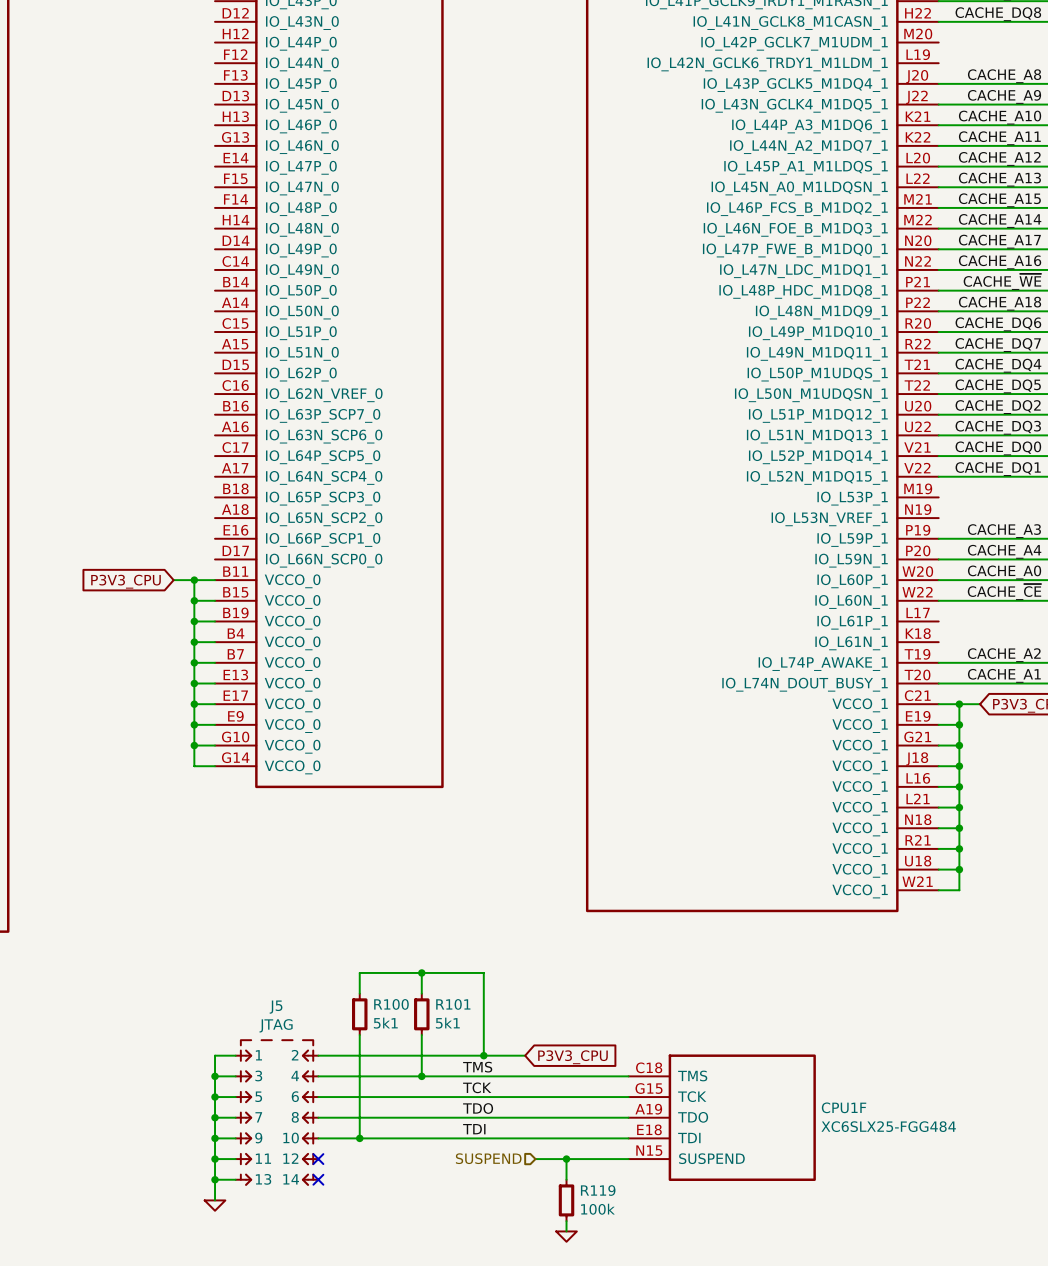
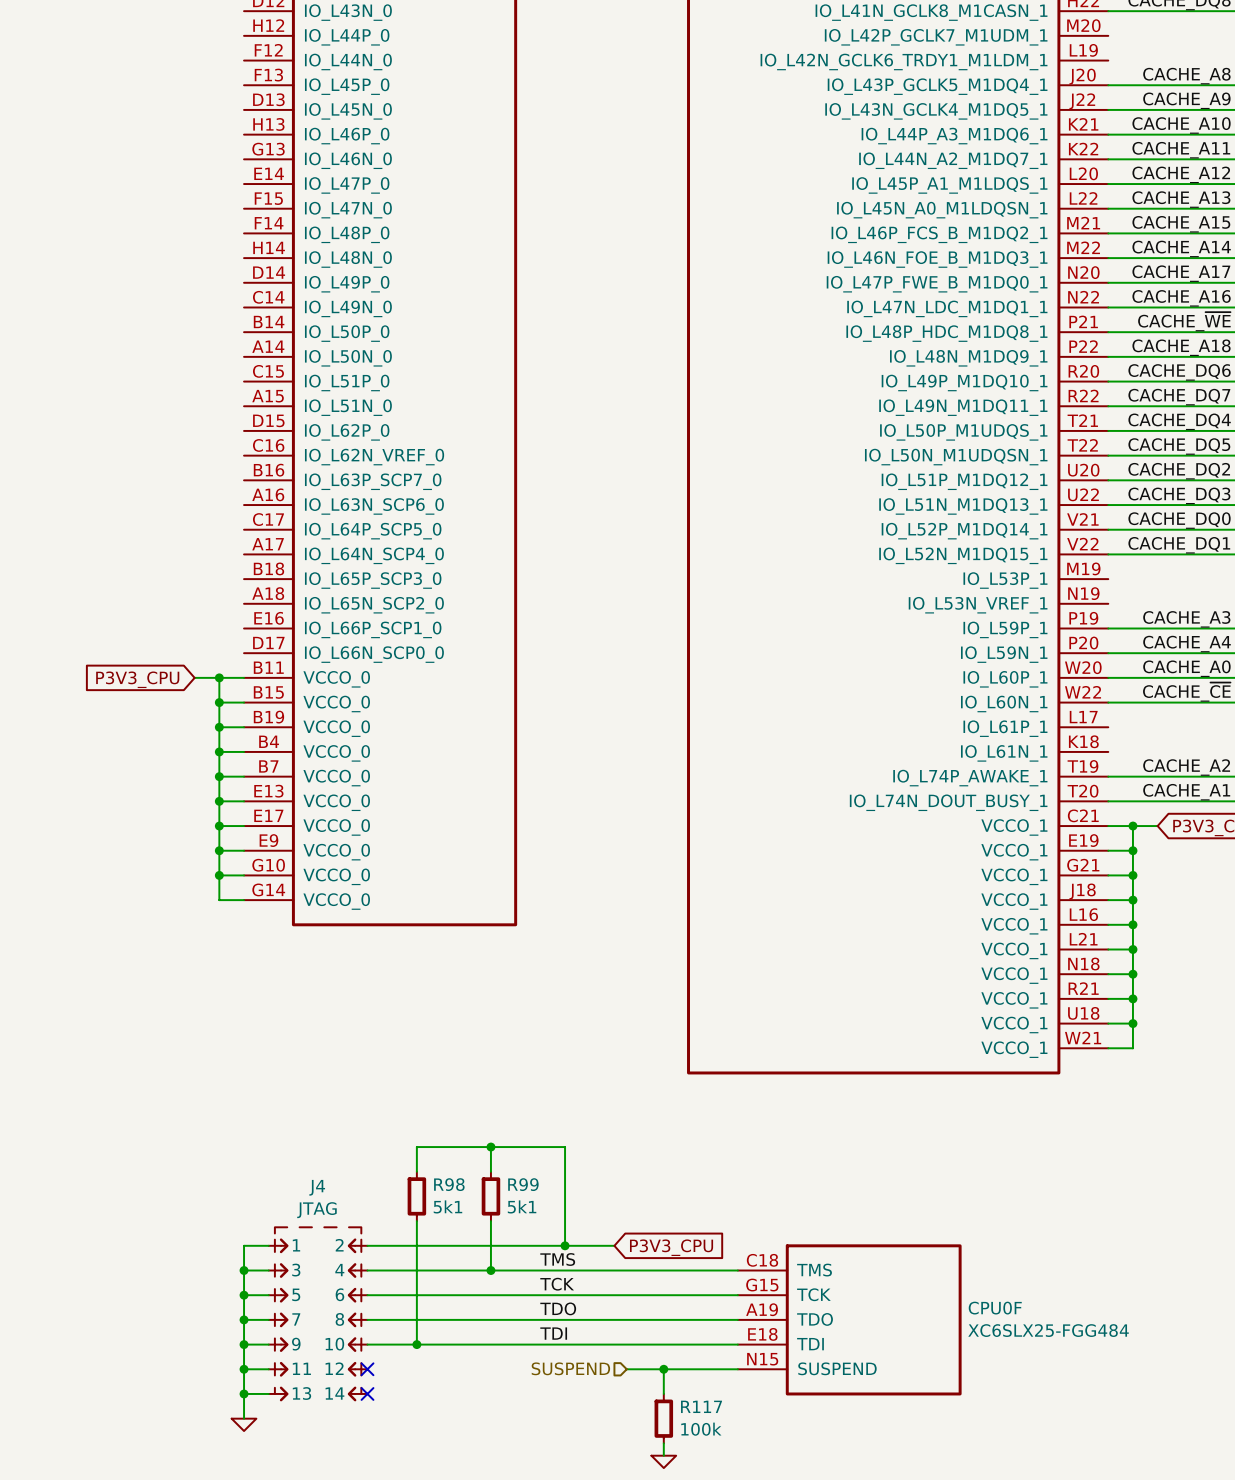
R100 name: R100 (391, 1004) -> R98 (449, 1184)
R101 name: R101 (453, 1004) -> R99 (523, 1184)
J5 name: J5 (276, 1007) -> J4 (317, 1187)
CPU1F name: CPU1F (844, 1107) -> CPU0F (995, 1308)
R119 name: R119 (598, 1190) -> R117 (701, 1406)

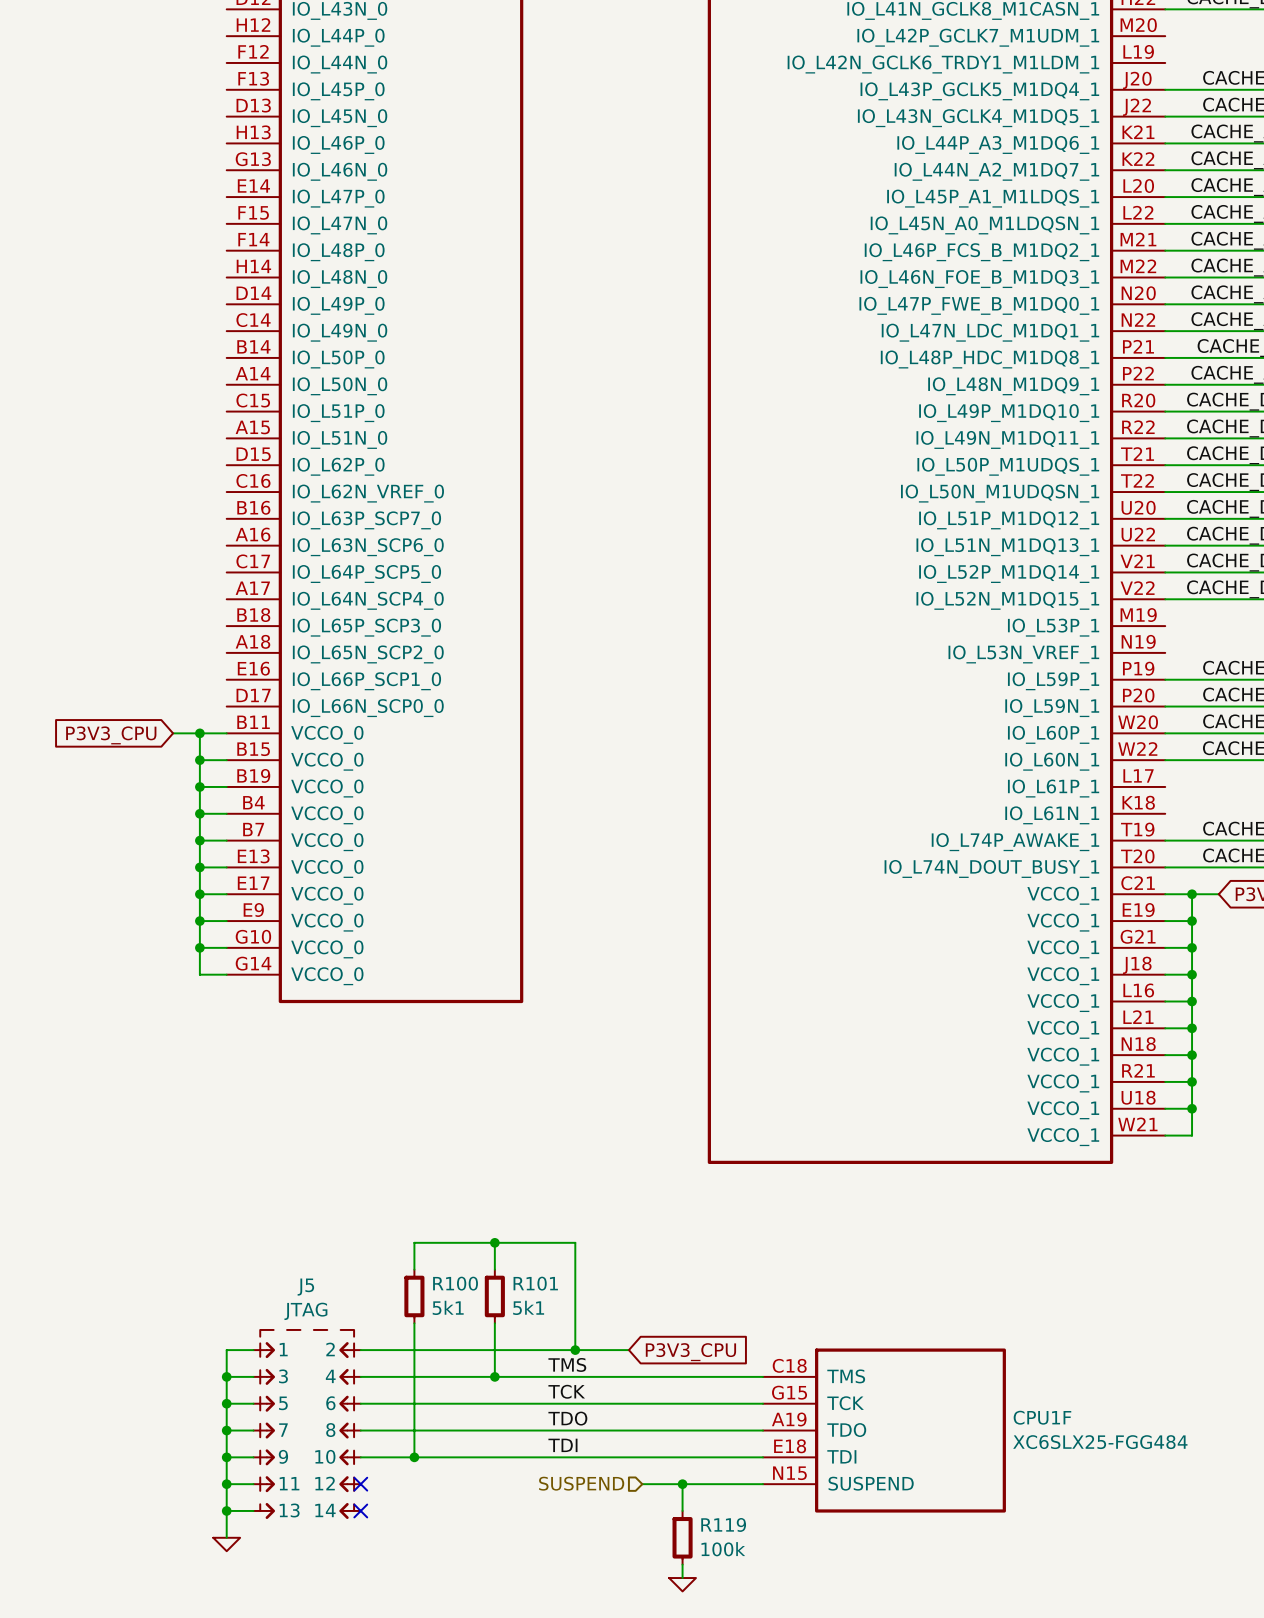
R98 name: R98 (449, 1184) -> R100 (455, 1283)
R99 name: R99 (523, 1184) -> R101 (535, 1283)
J4 name: J4 (317, 1187) -> J5 (305, 1287)
CPU0F name: CPU0F (995, 1308) -> CPU1F (1042, 1417)
R117 name: R117 (701, 1406) -> R119 (723, 1524)

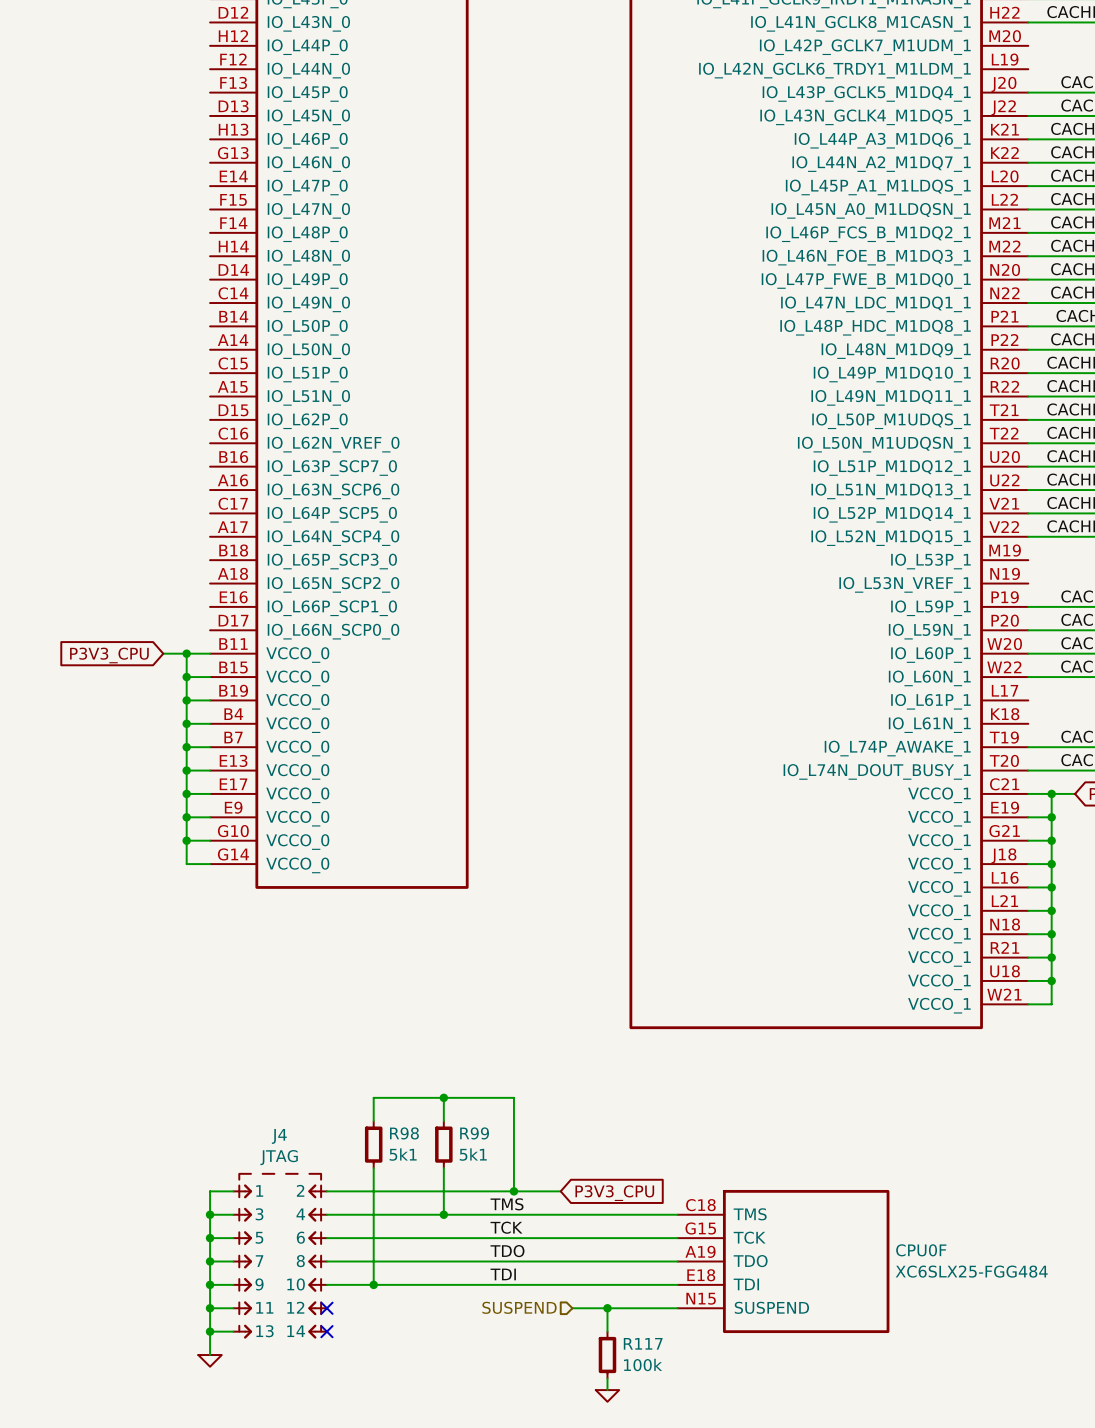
R100 name: R100 (455, 1283) -> R98 (404, 1133)
R101 name: R101 (535, 1283) -> R99 (474, 1133)
J5 name: J5 (305, 1287) -> J4 (279, 1136)
CPU1F name: CPU1F (1042, 1417) -> CPU0F (921, 1250)
R119 name: R119 (723, 1524) -> R117 (643, 1343)

